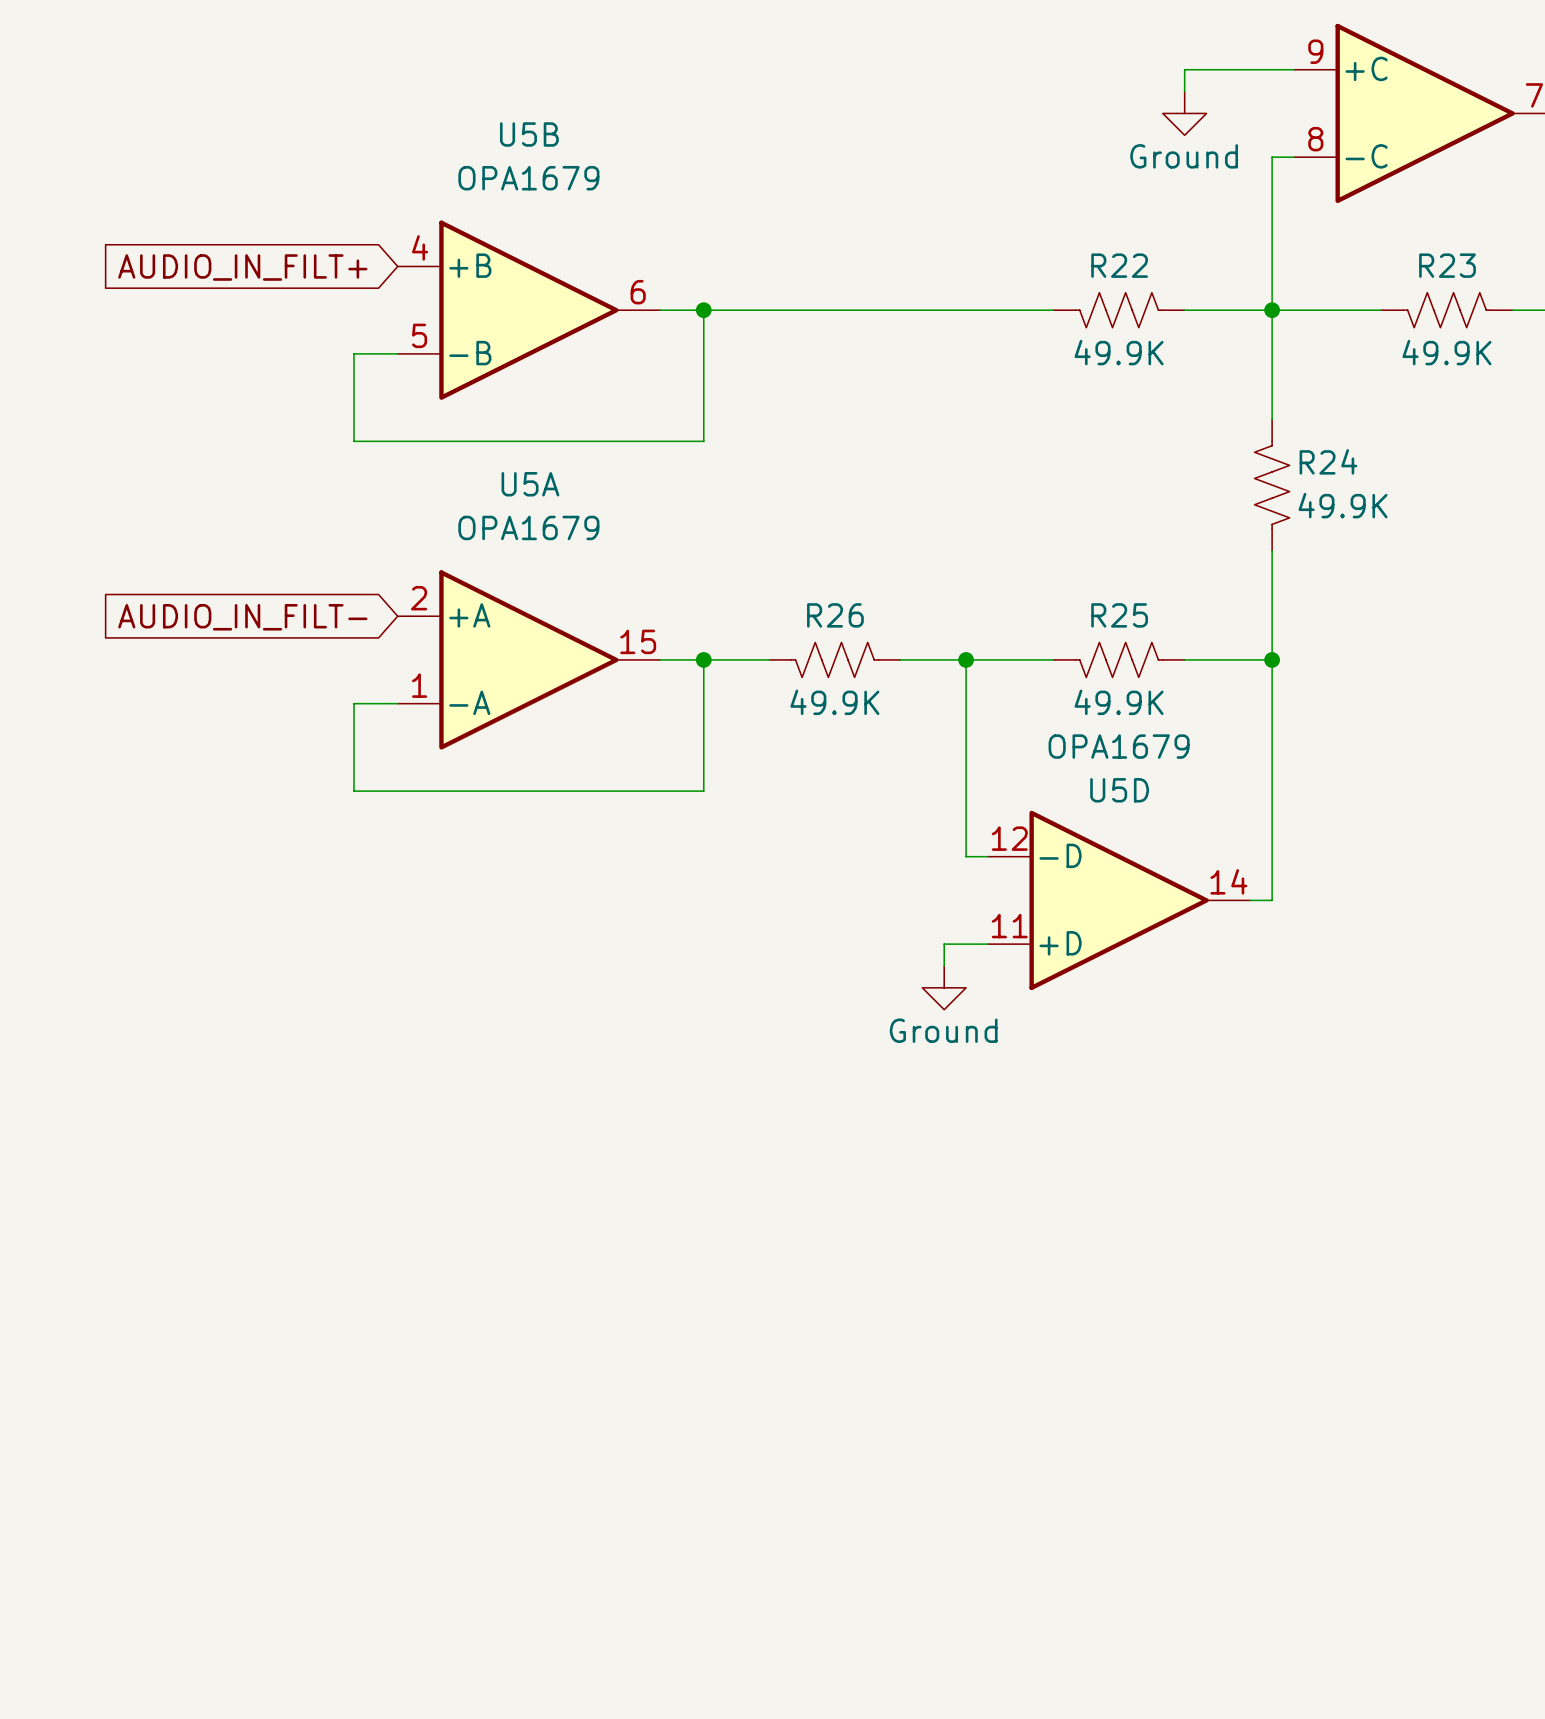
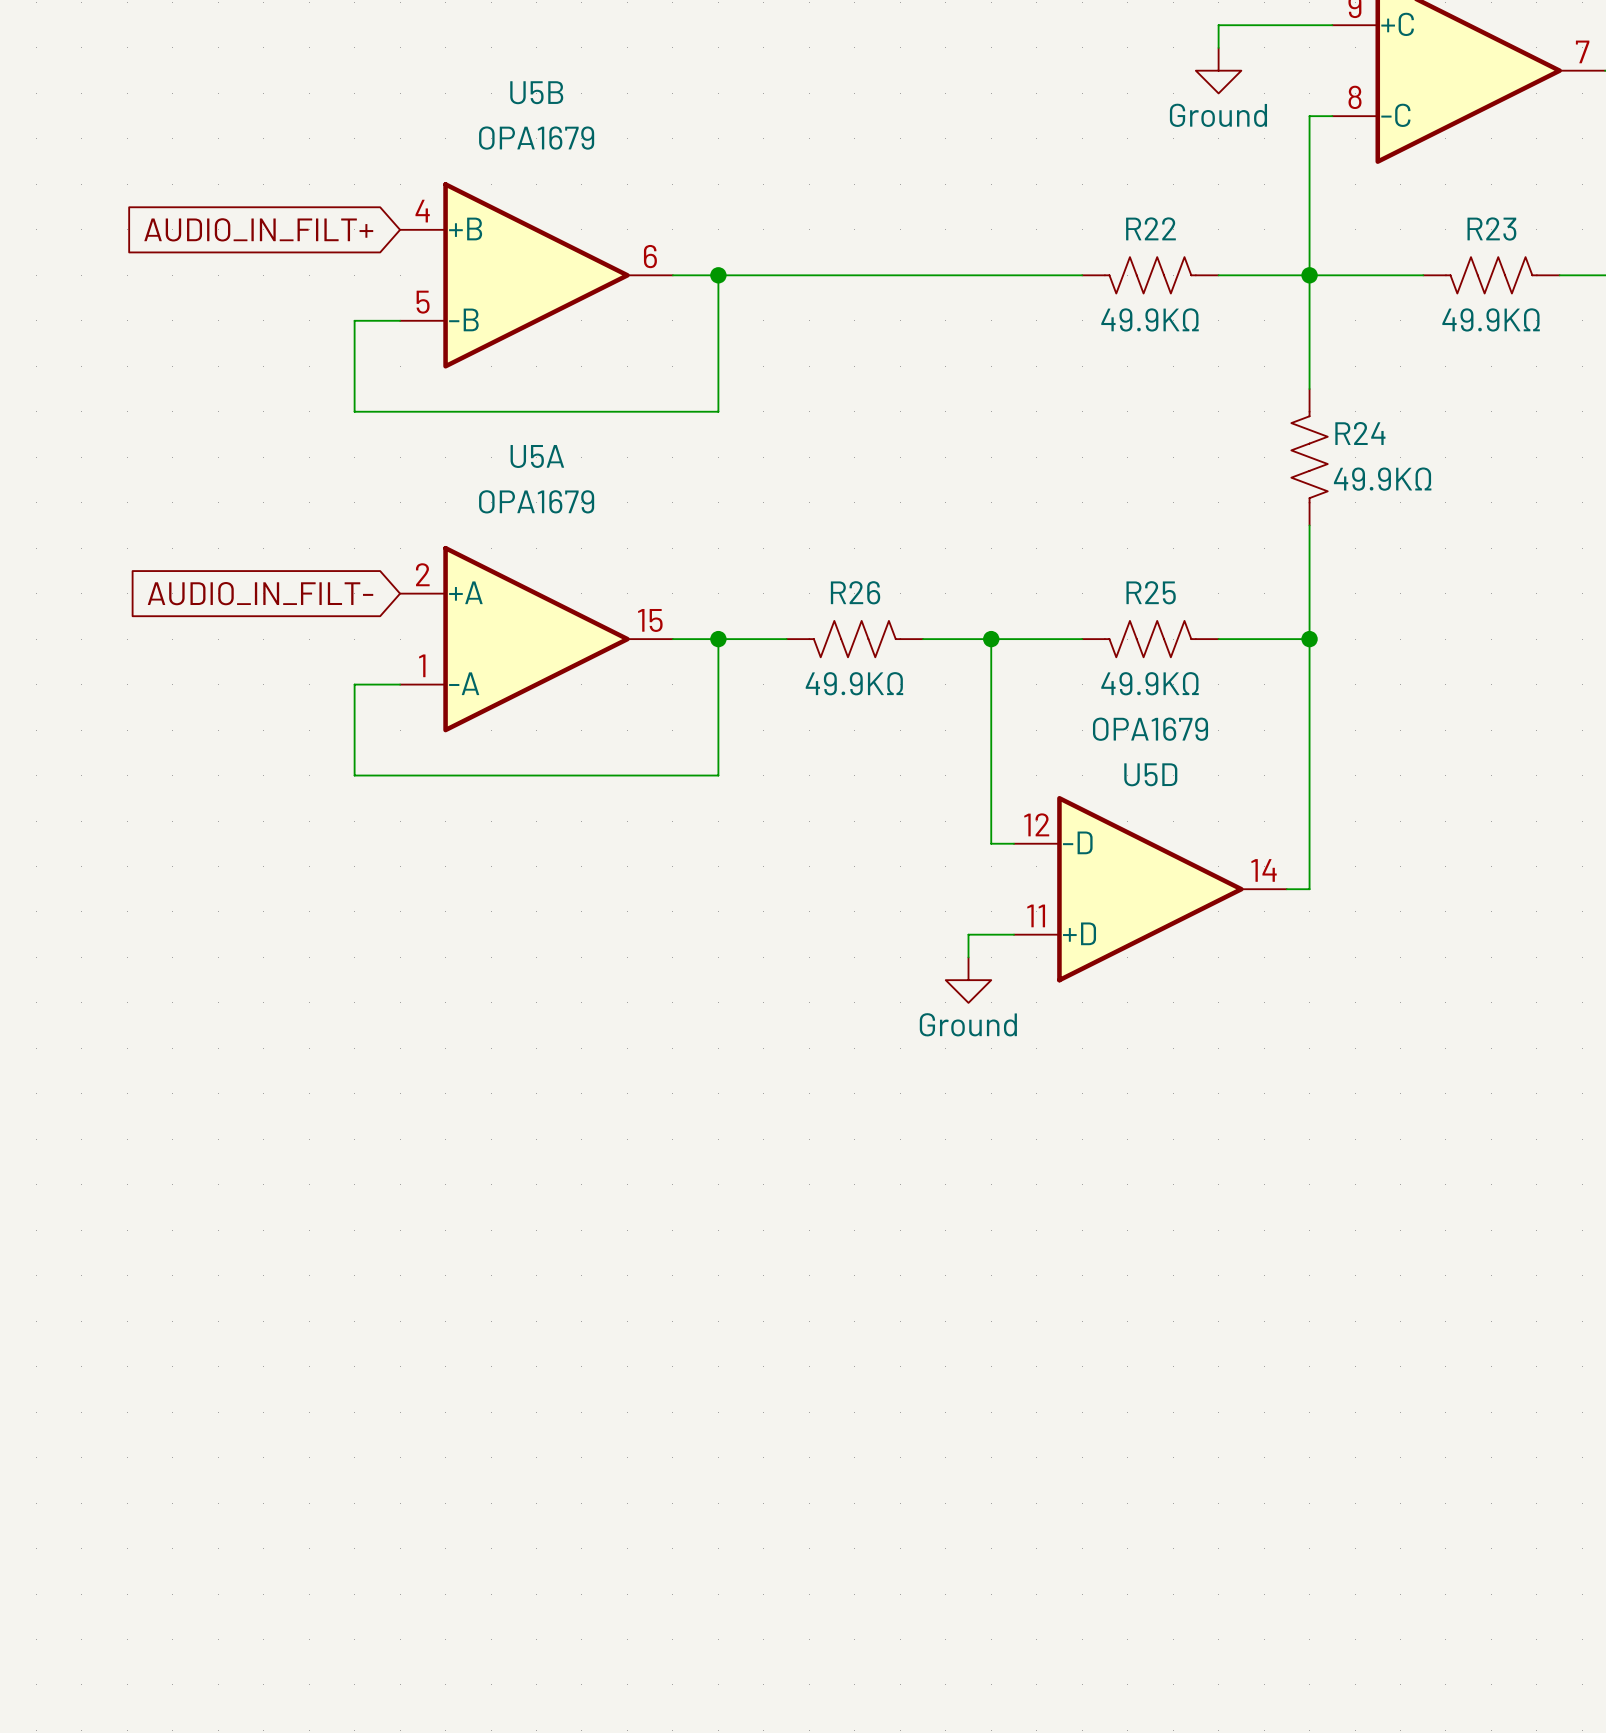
R22 value: 49.9K (1119, 352) -> 49.9KΩ (1150, 319)
R23 value: 49.9K (1446, 352) -> 49.9KΩ (1491, 319)
R24 value: 49.9K (1343, 505) -> 49.9KΩ (1382, 479)
R26 value: 49.9K (834, 702) -> 49.9KΩ (854, 683)
R25 value: 49.9K (1119, 702) -> 49.9KΩ (1150, 683)

